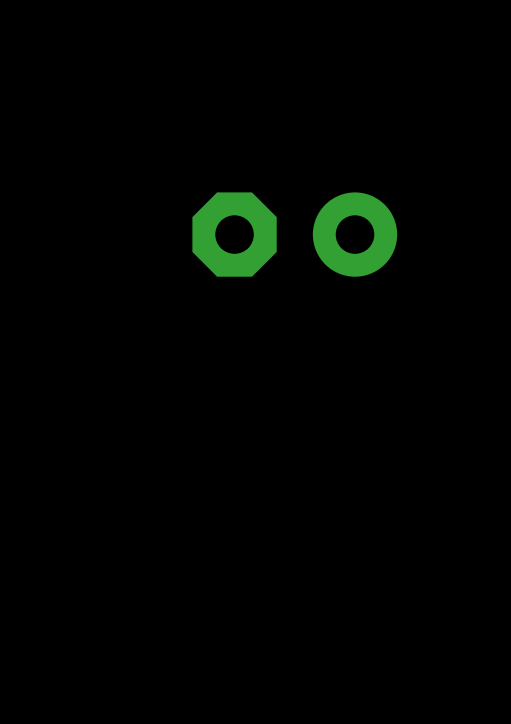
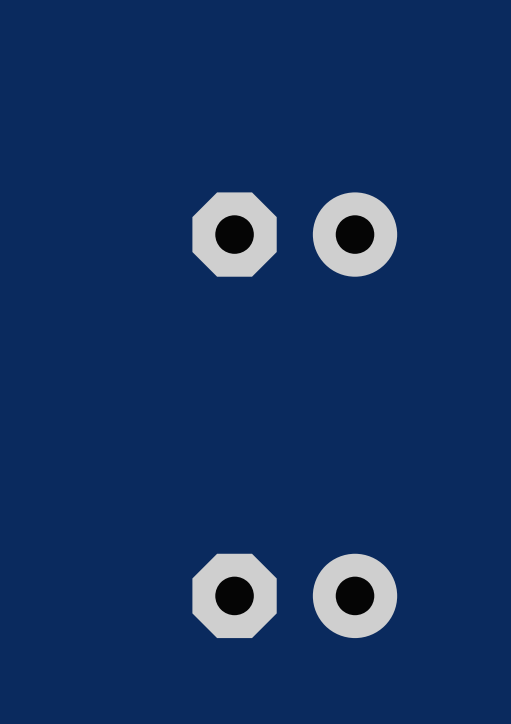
part: none -> (294, 595)

